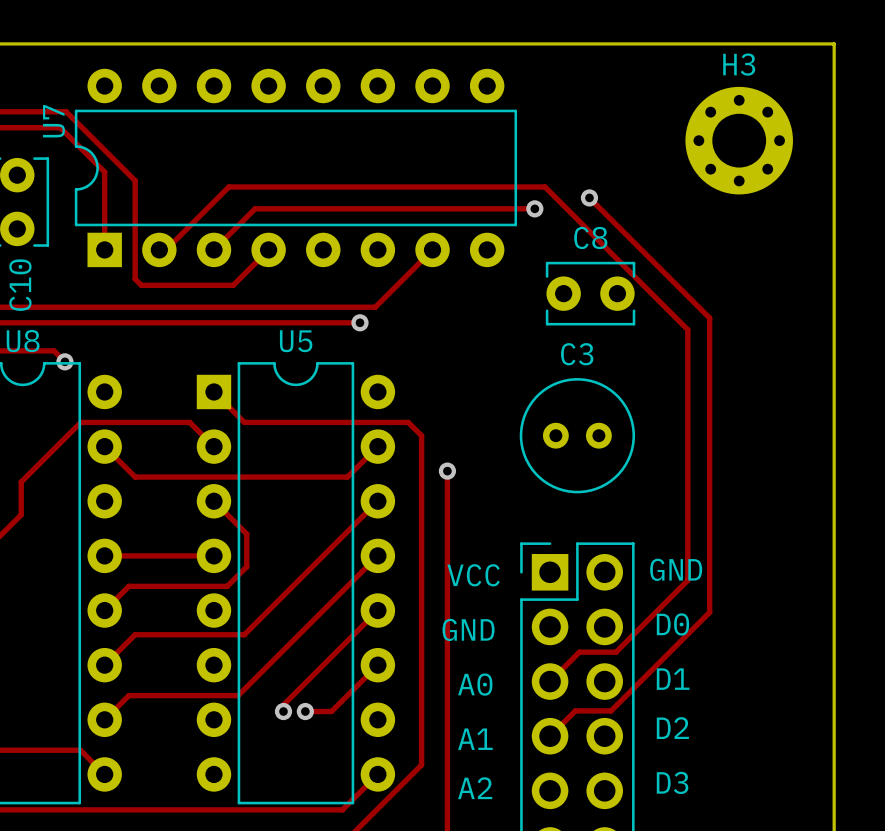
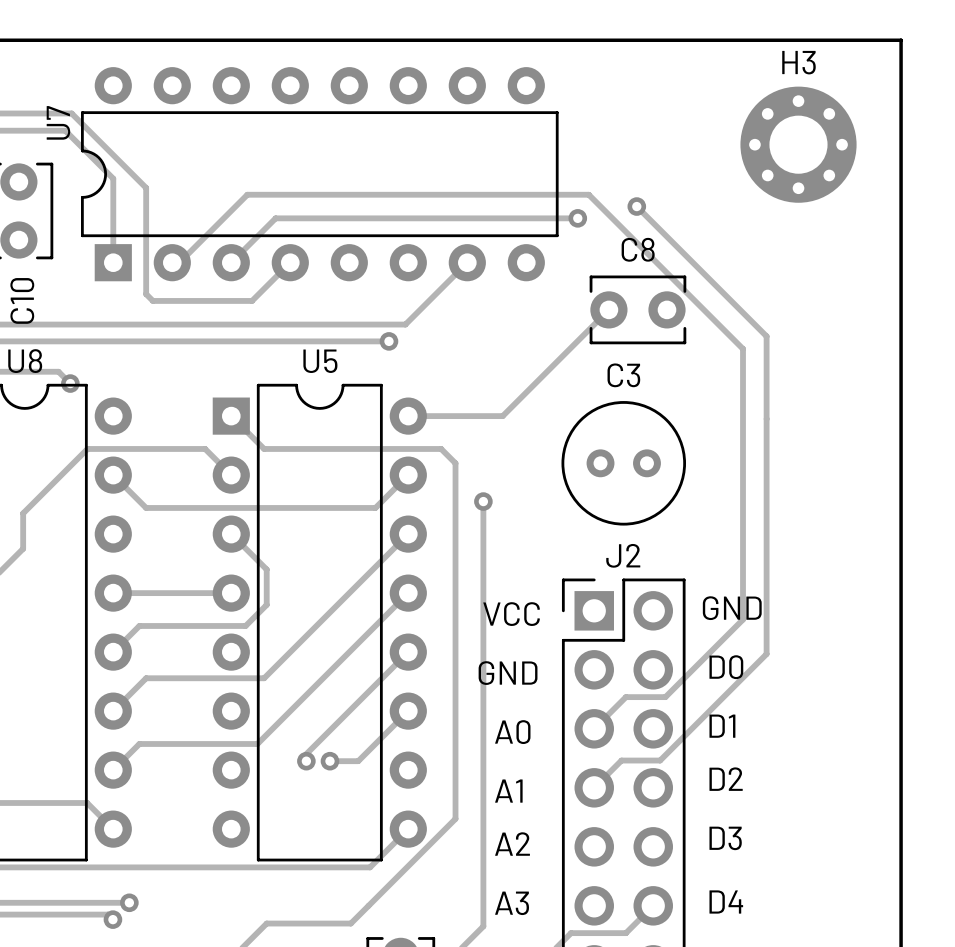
track: none -> (608, 309) (502, 416) (408, 416)
J2 name: none -> J2 (623, 555)

